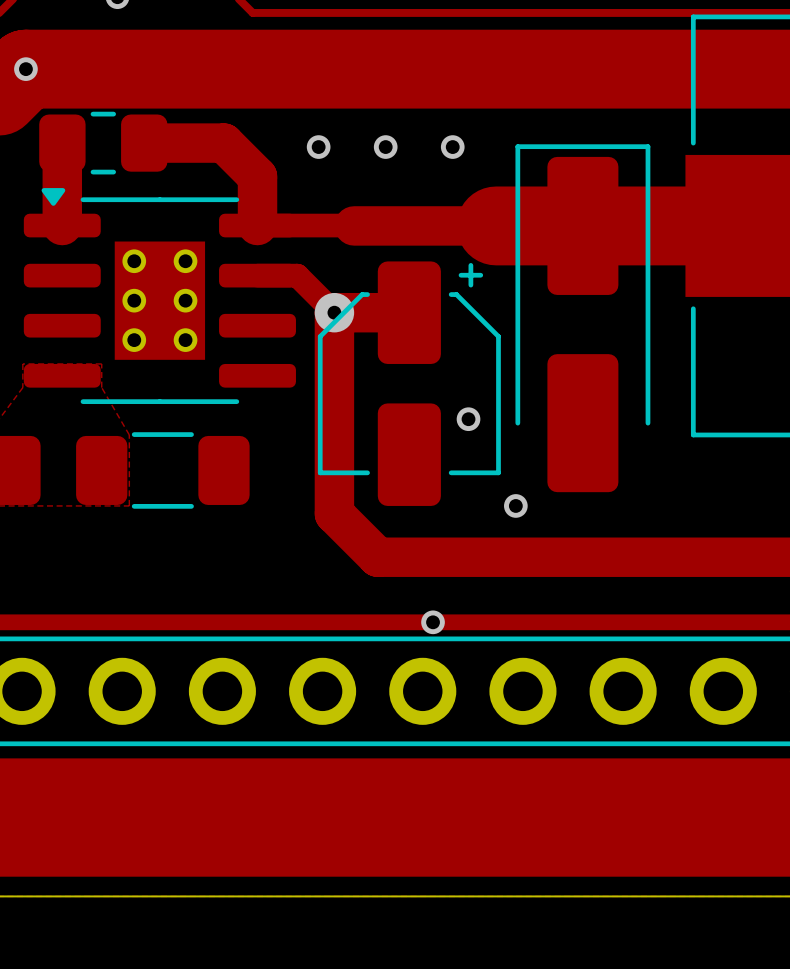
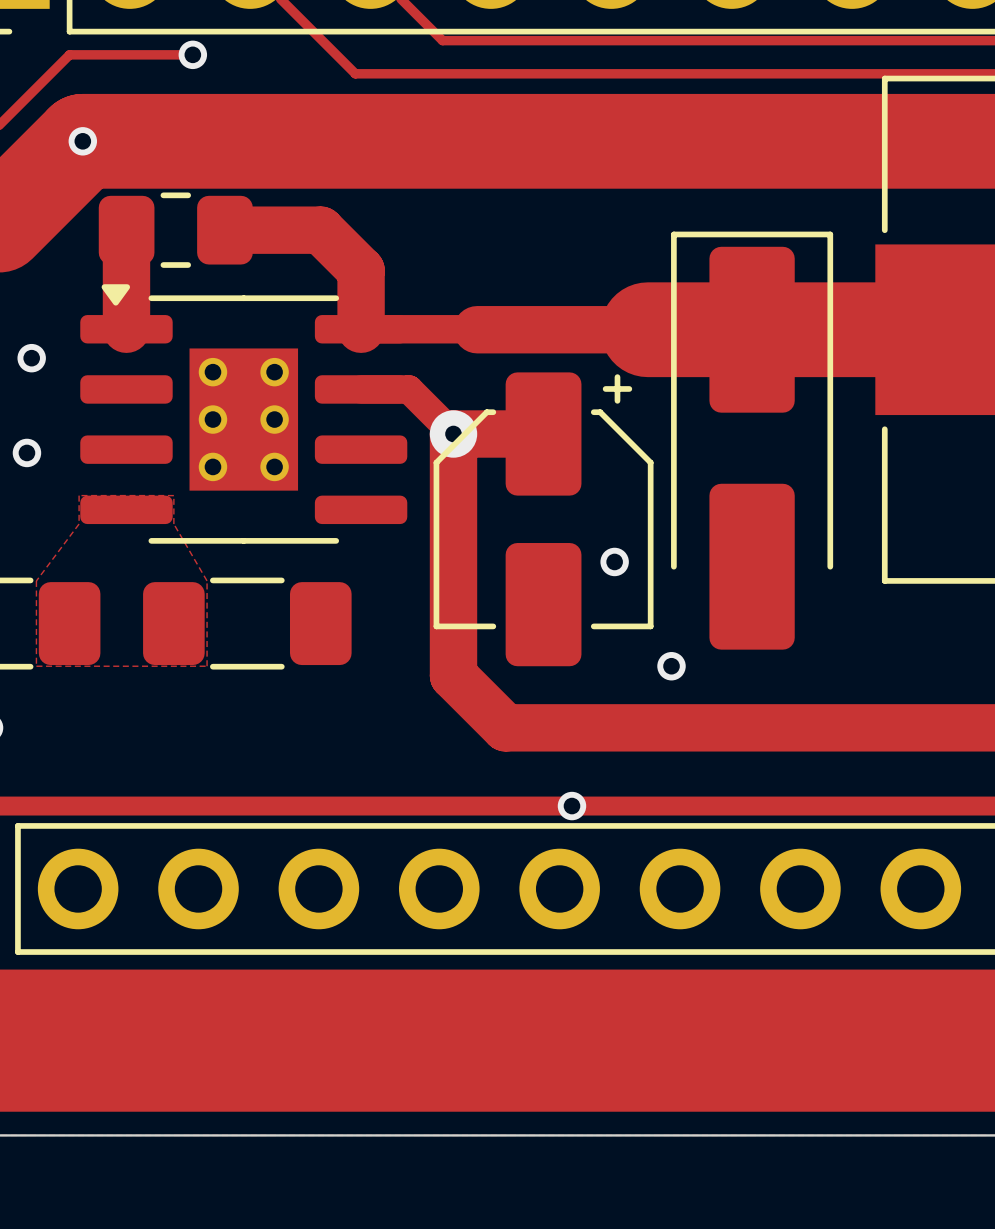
via: (318, 147) -> none
via: (385, 147) -> none
via: (452, 147) -> none

